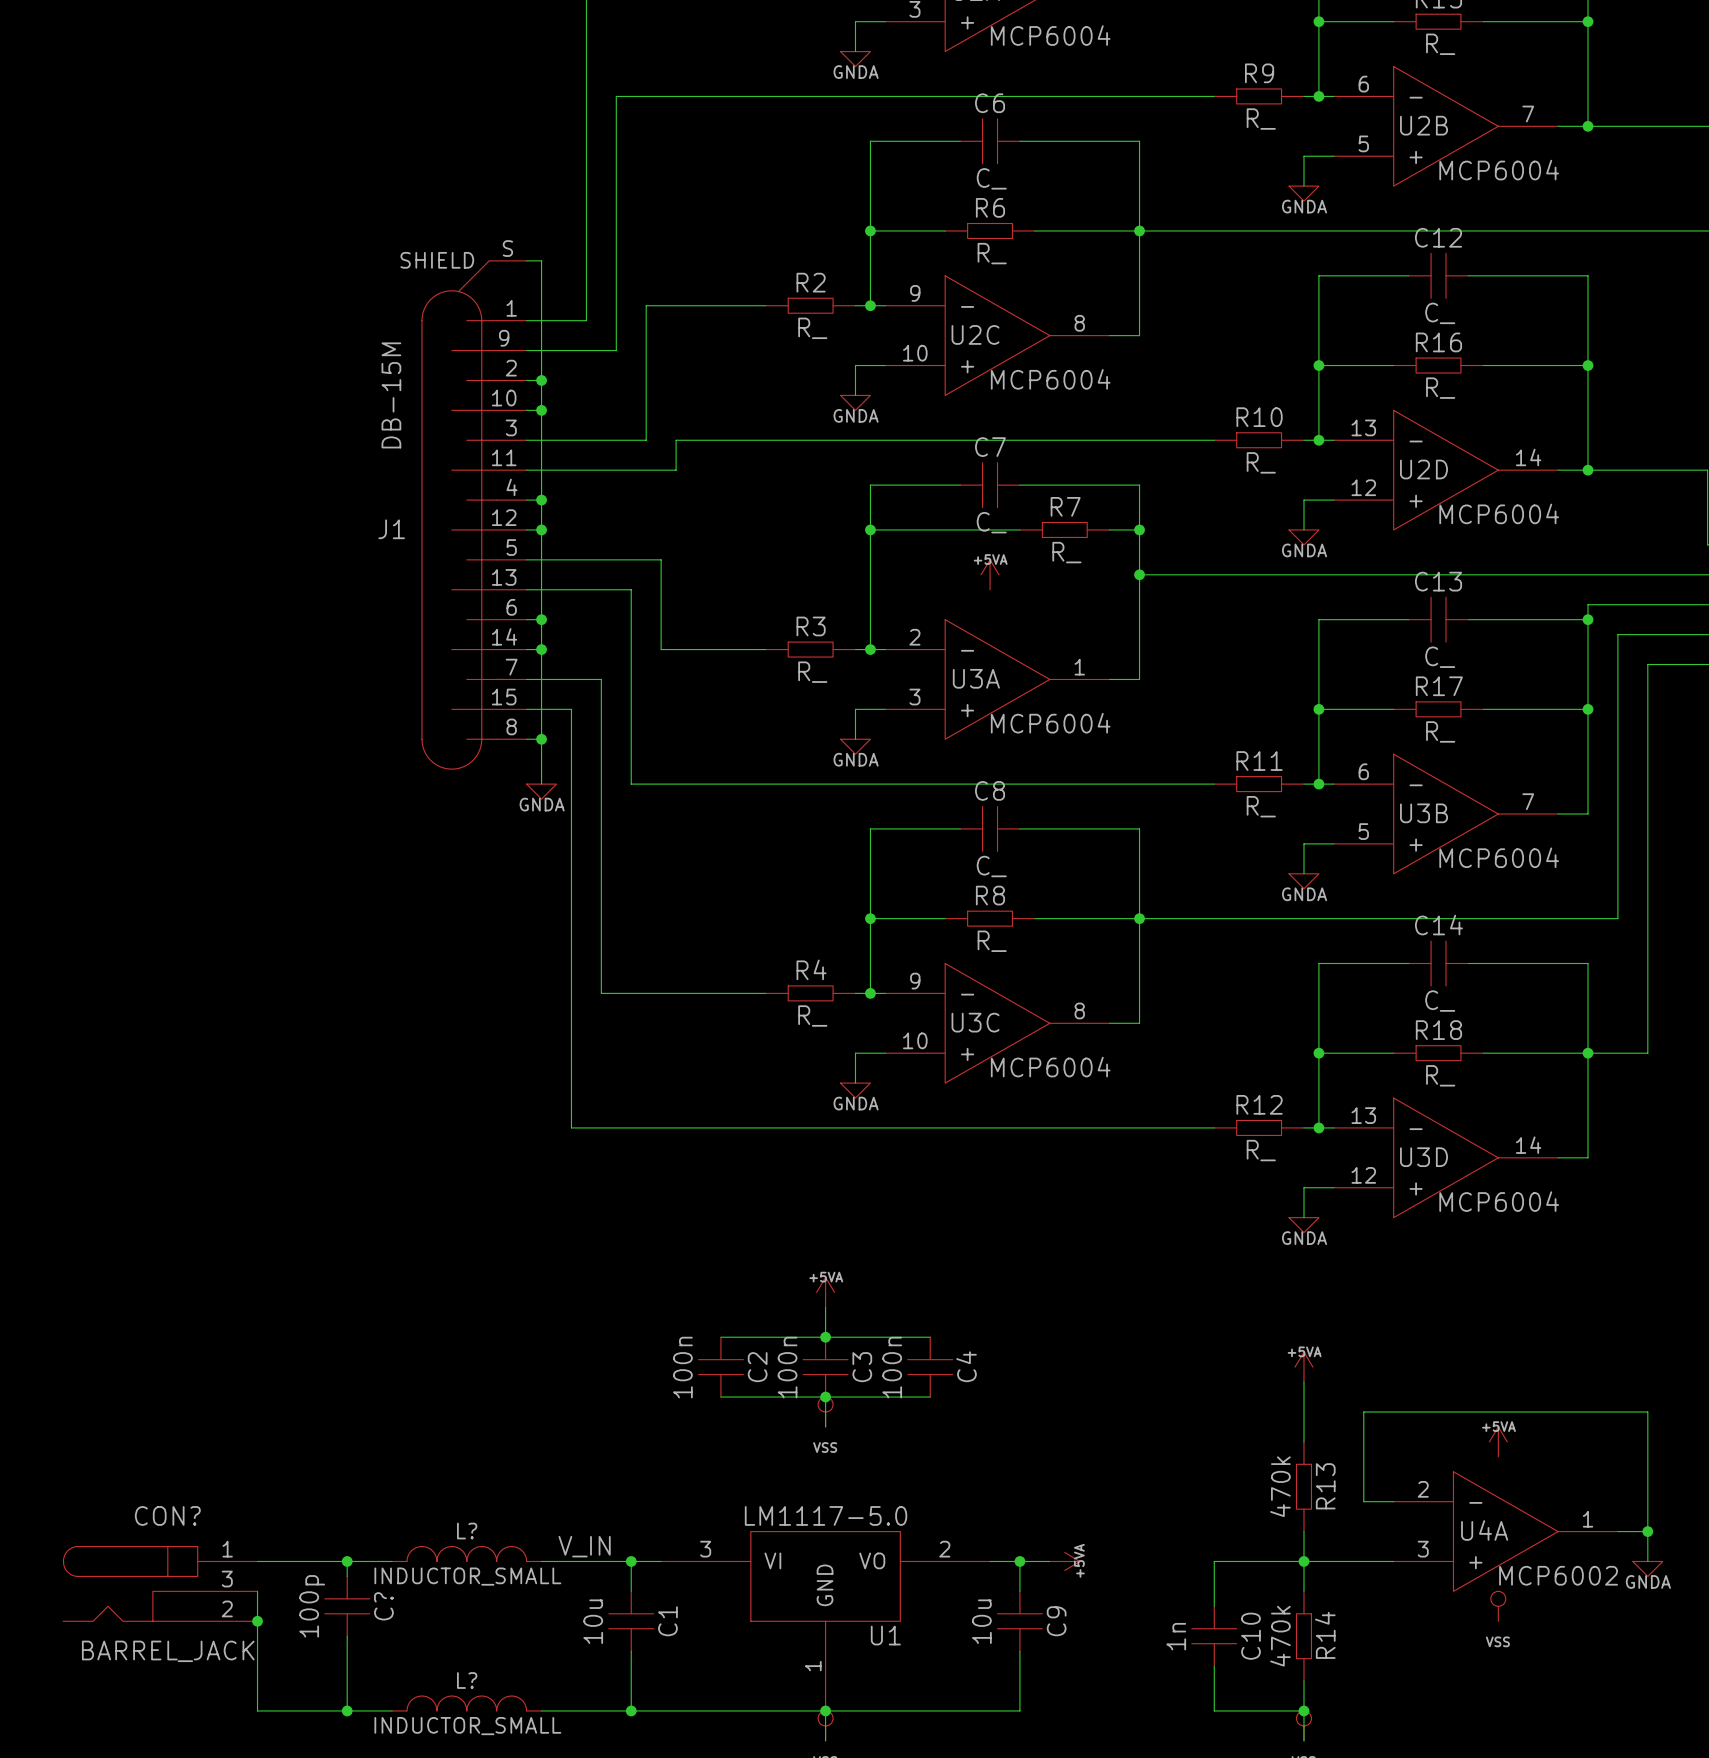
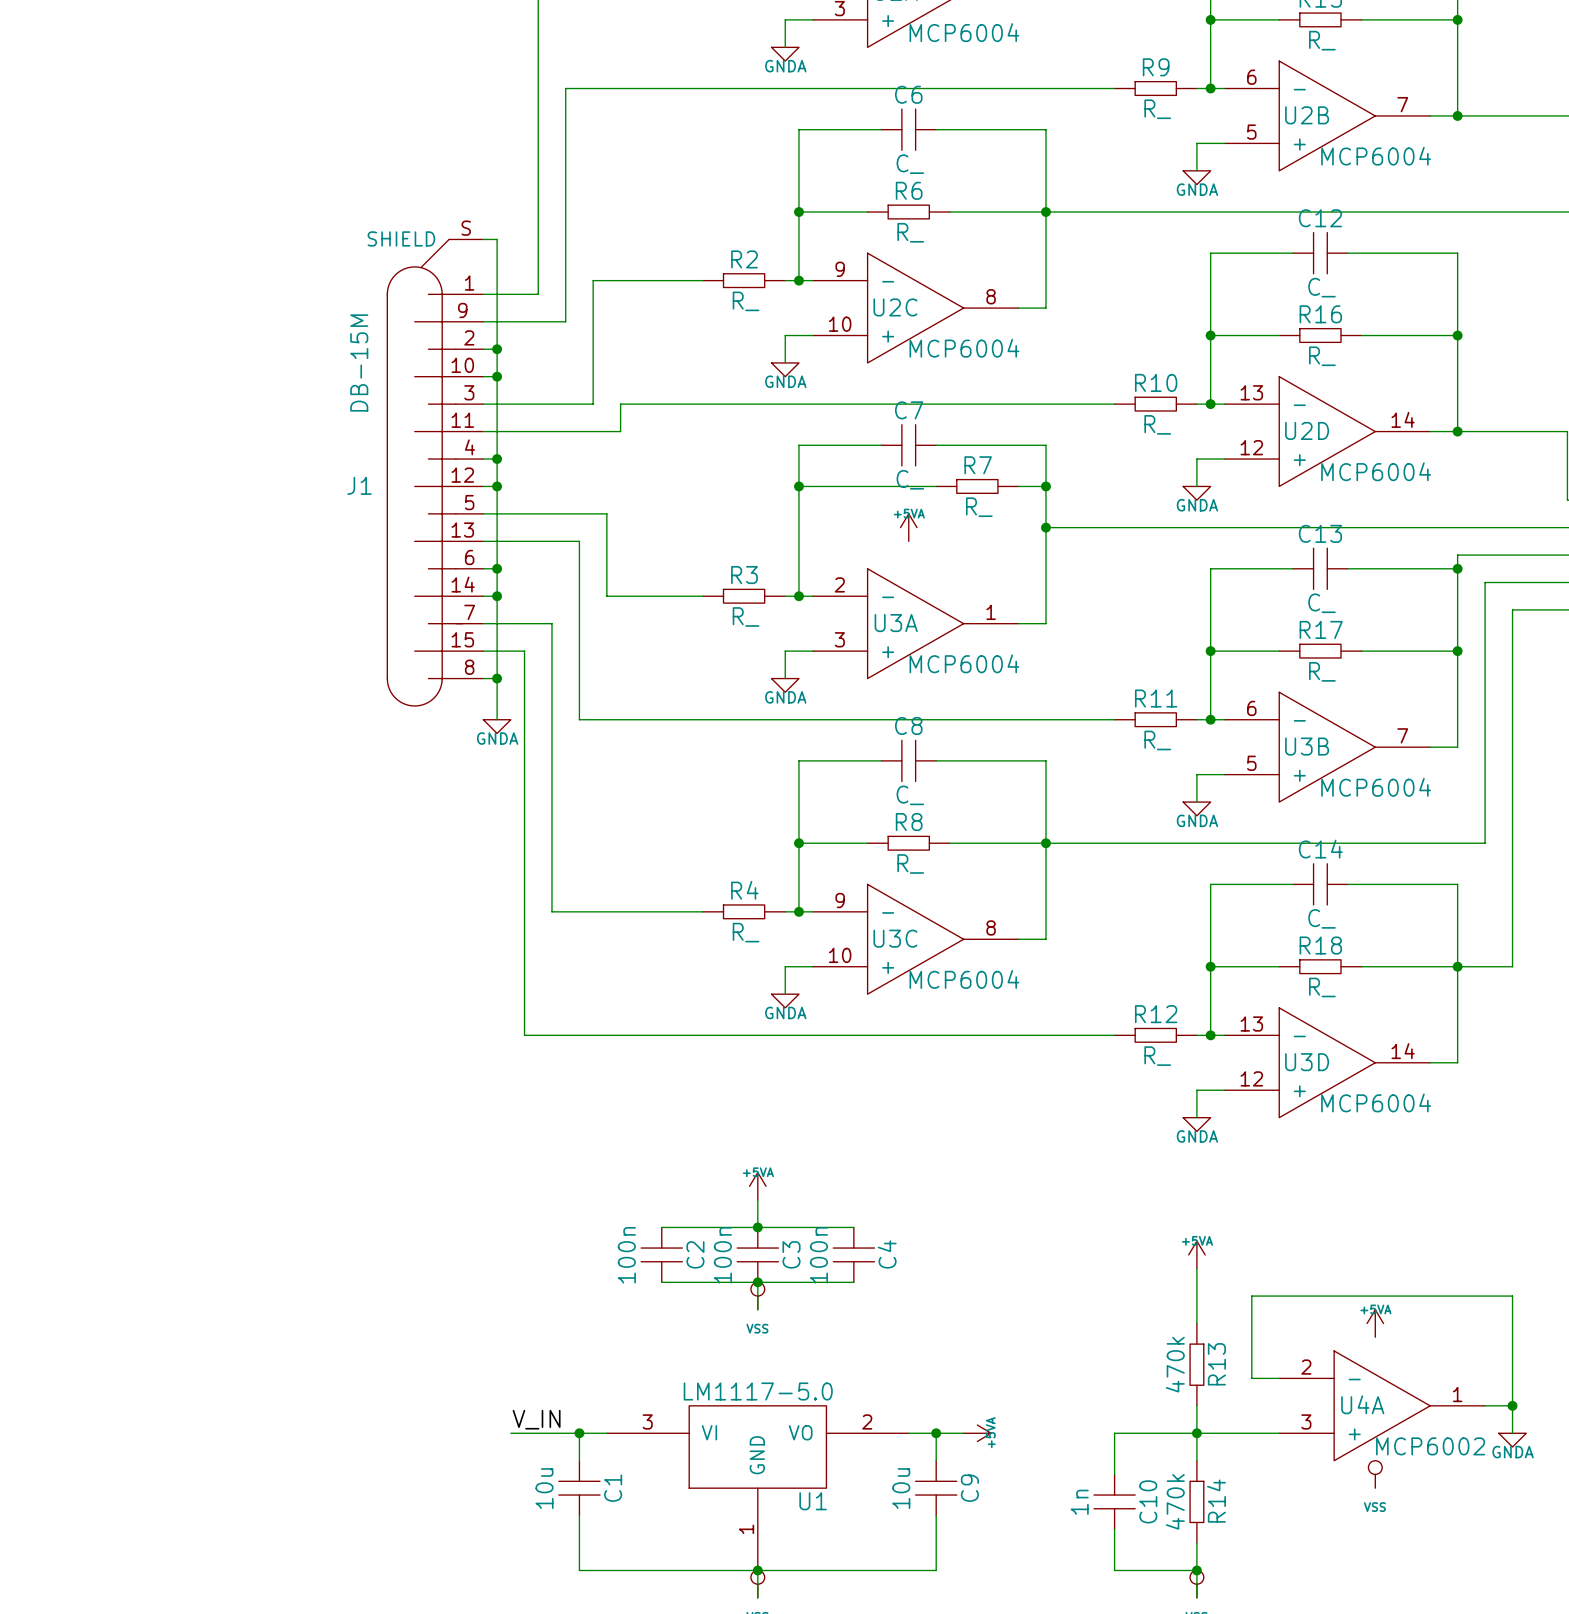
L?: INDUCTOR_SMALL (466, 1554) -> none
wire: (257, 1561) (392, 1561) -> none
wire: (347, 1561) (347, 1576) -> none
junction: (347, 1561) -> none
wire: (541, 1561) (556, 1561) -> none
CON?: BARREL_JACK (160, 1583) -> none
wire: (257, 1591) (257, 1710) (392, 1710) -> none
C?: 100p (347, 1606) -> none
junction: (257, 1621) -> none
wire: (347, 1636) (347, 1710) -> none
L?: INDUCTOR_SMALL (466, 1703) -> none
junction: (347, 1710) -> none
wire: (541, 1710) (631, 1710) -> none
junction: (631, 1710) -> none

